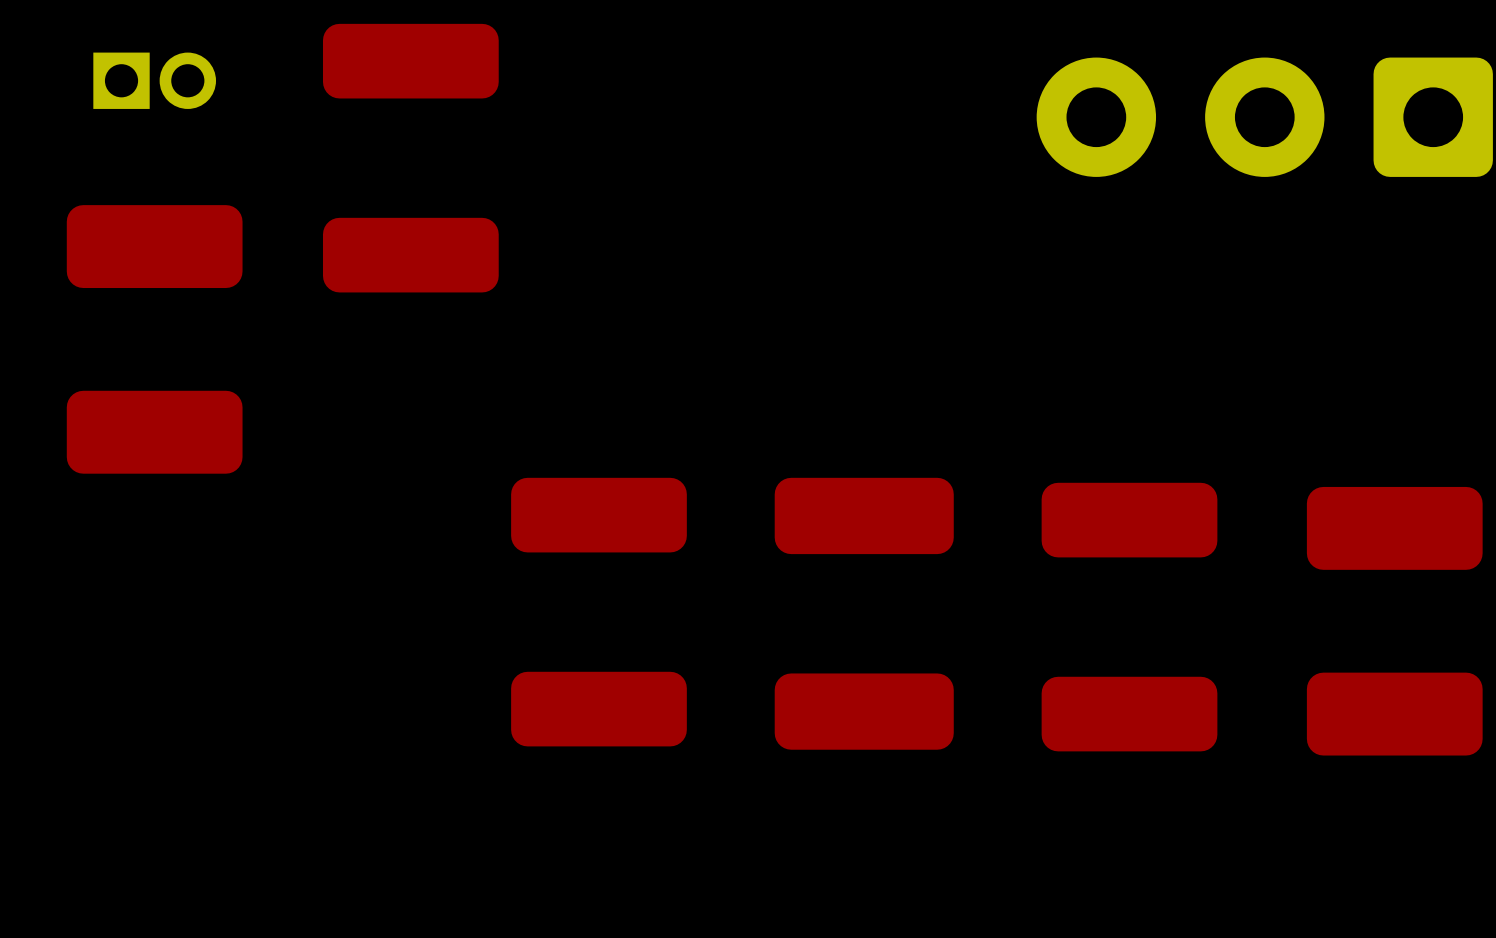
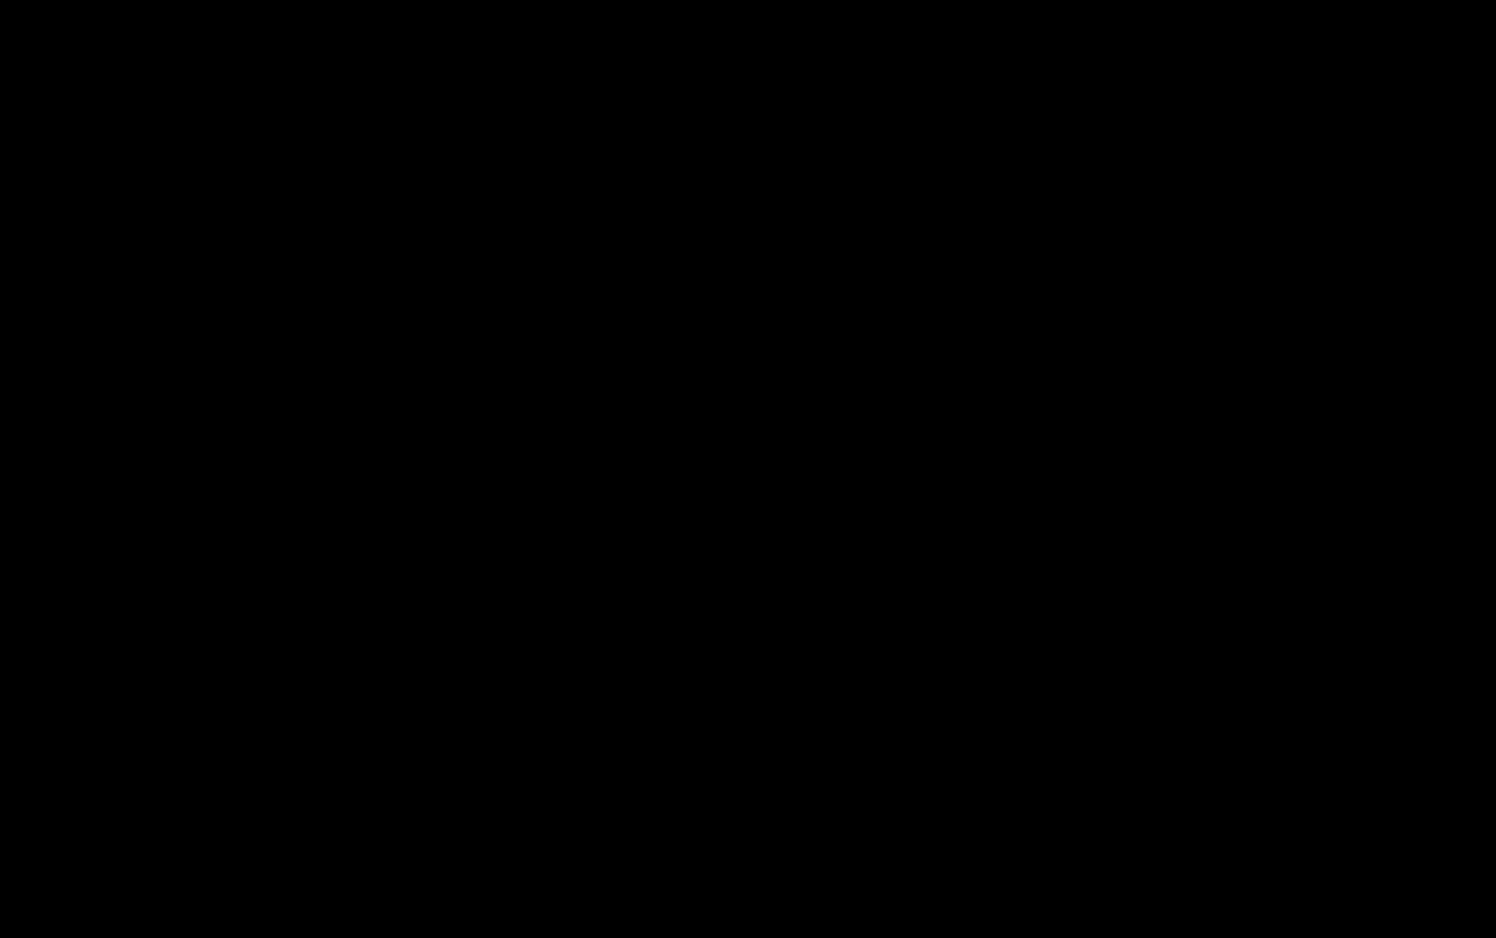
part: (154, 80) -> none
part: (1264, 117) -> none
part: (410, 158) -> none
part: (154, 339) -> none
part: (598, 612) -> none
part: (864, 613) -> none
part: (1129, 617) -> none
part: (1394, 621) -> none

